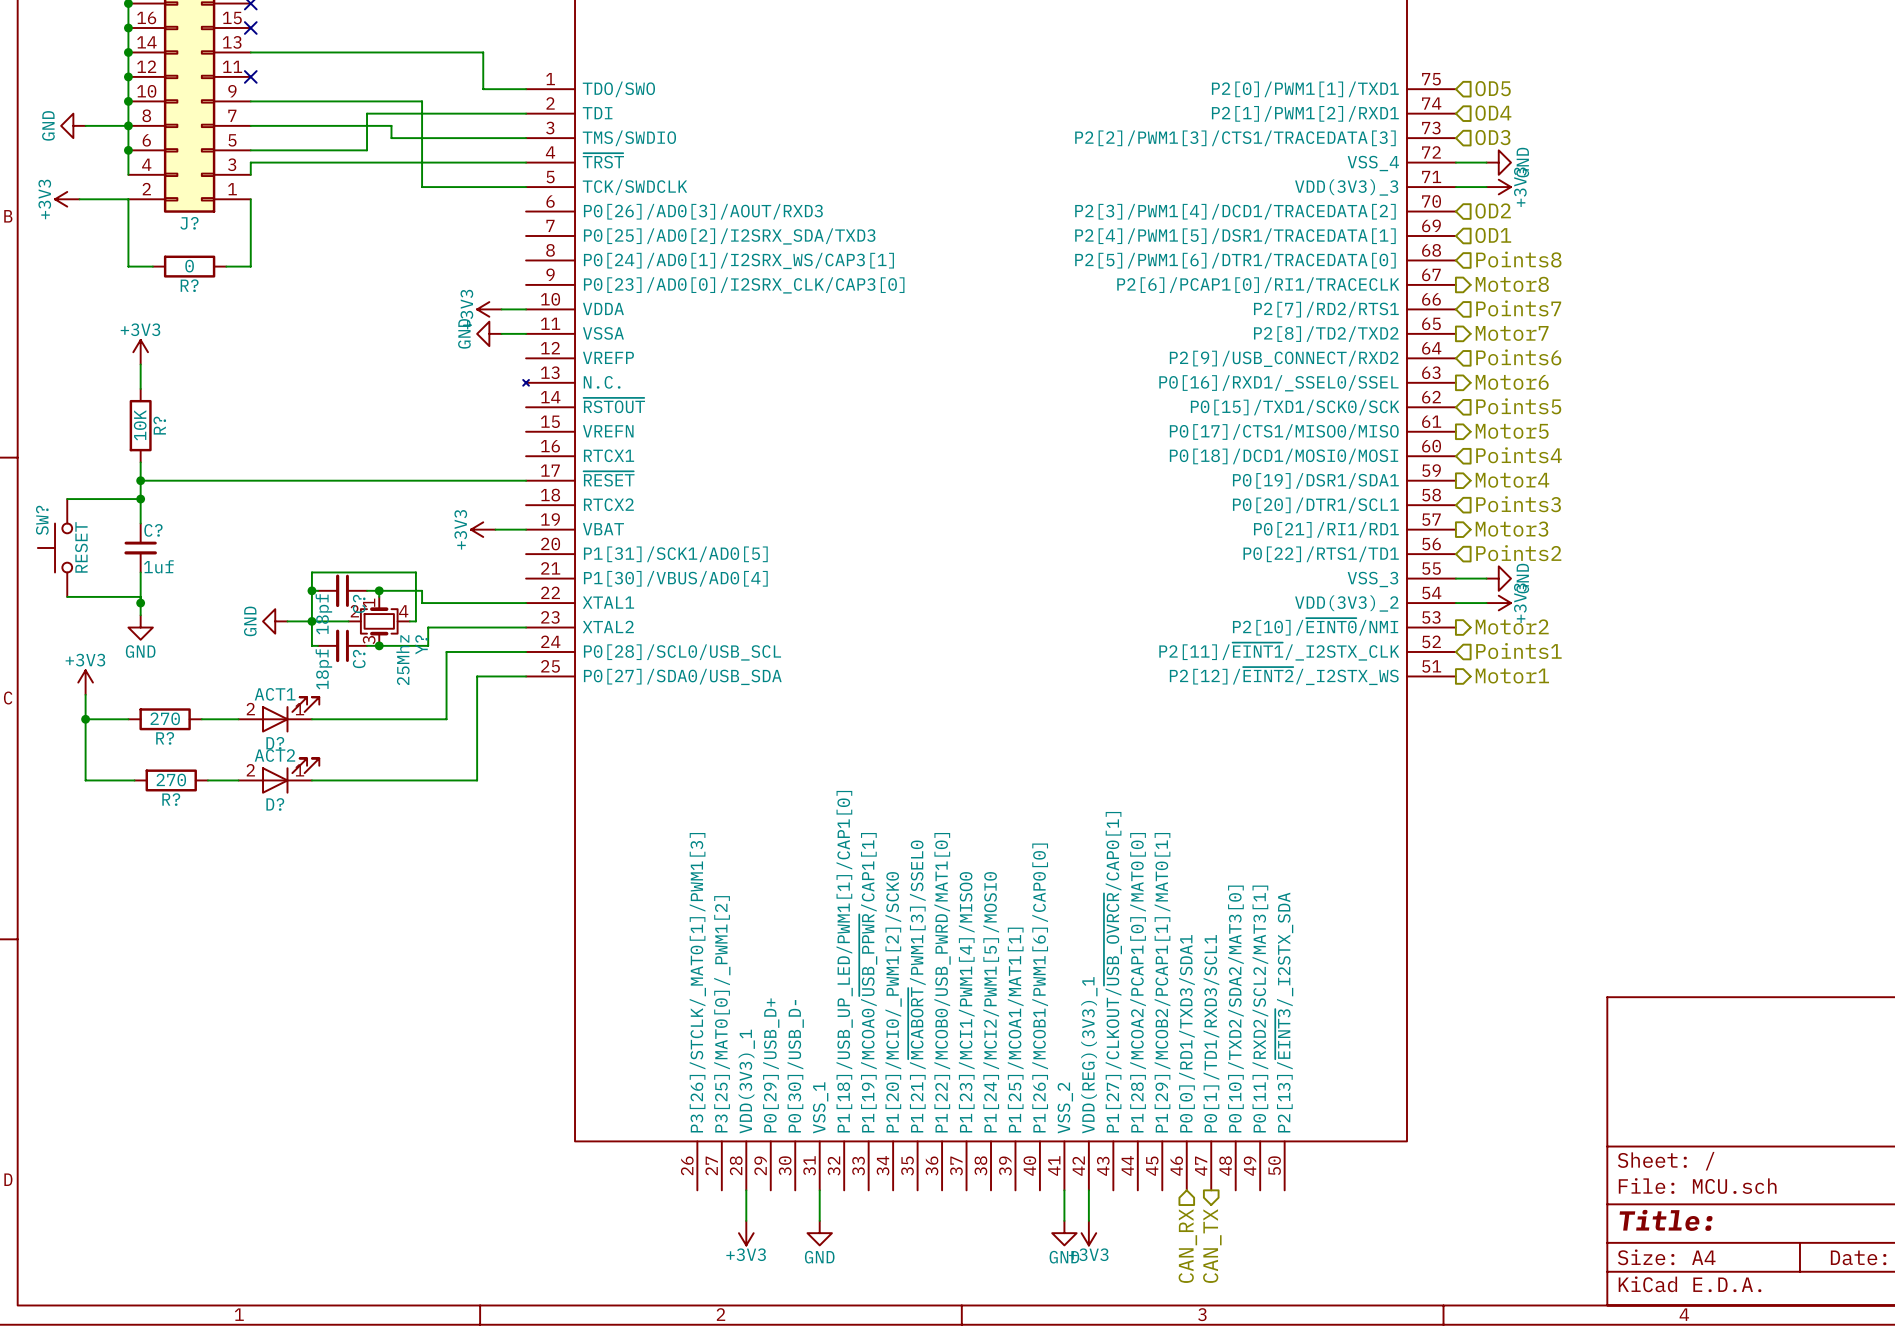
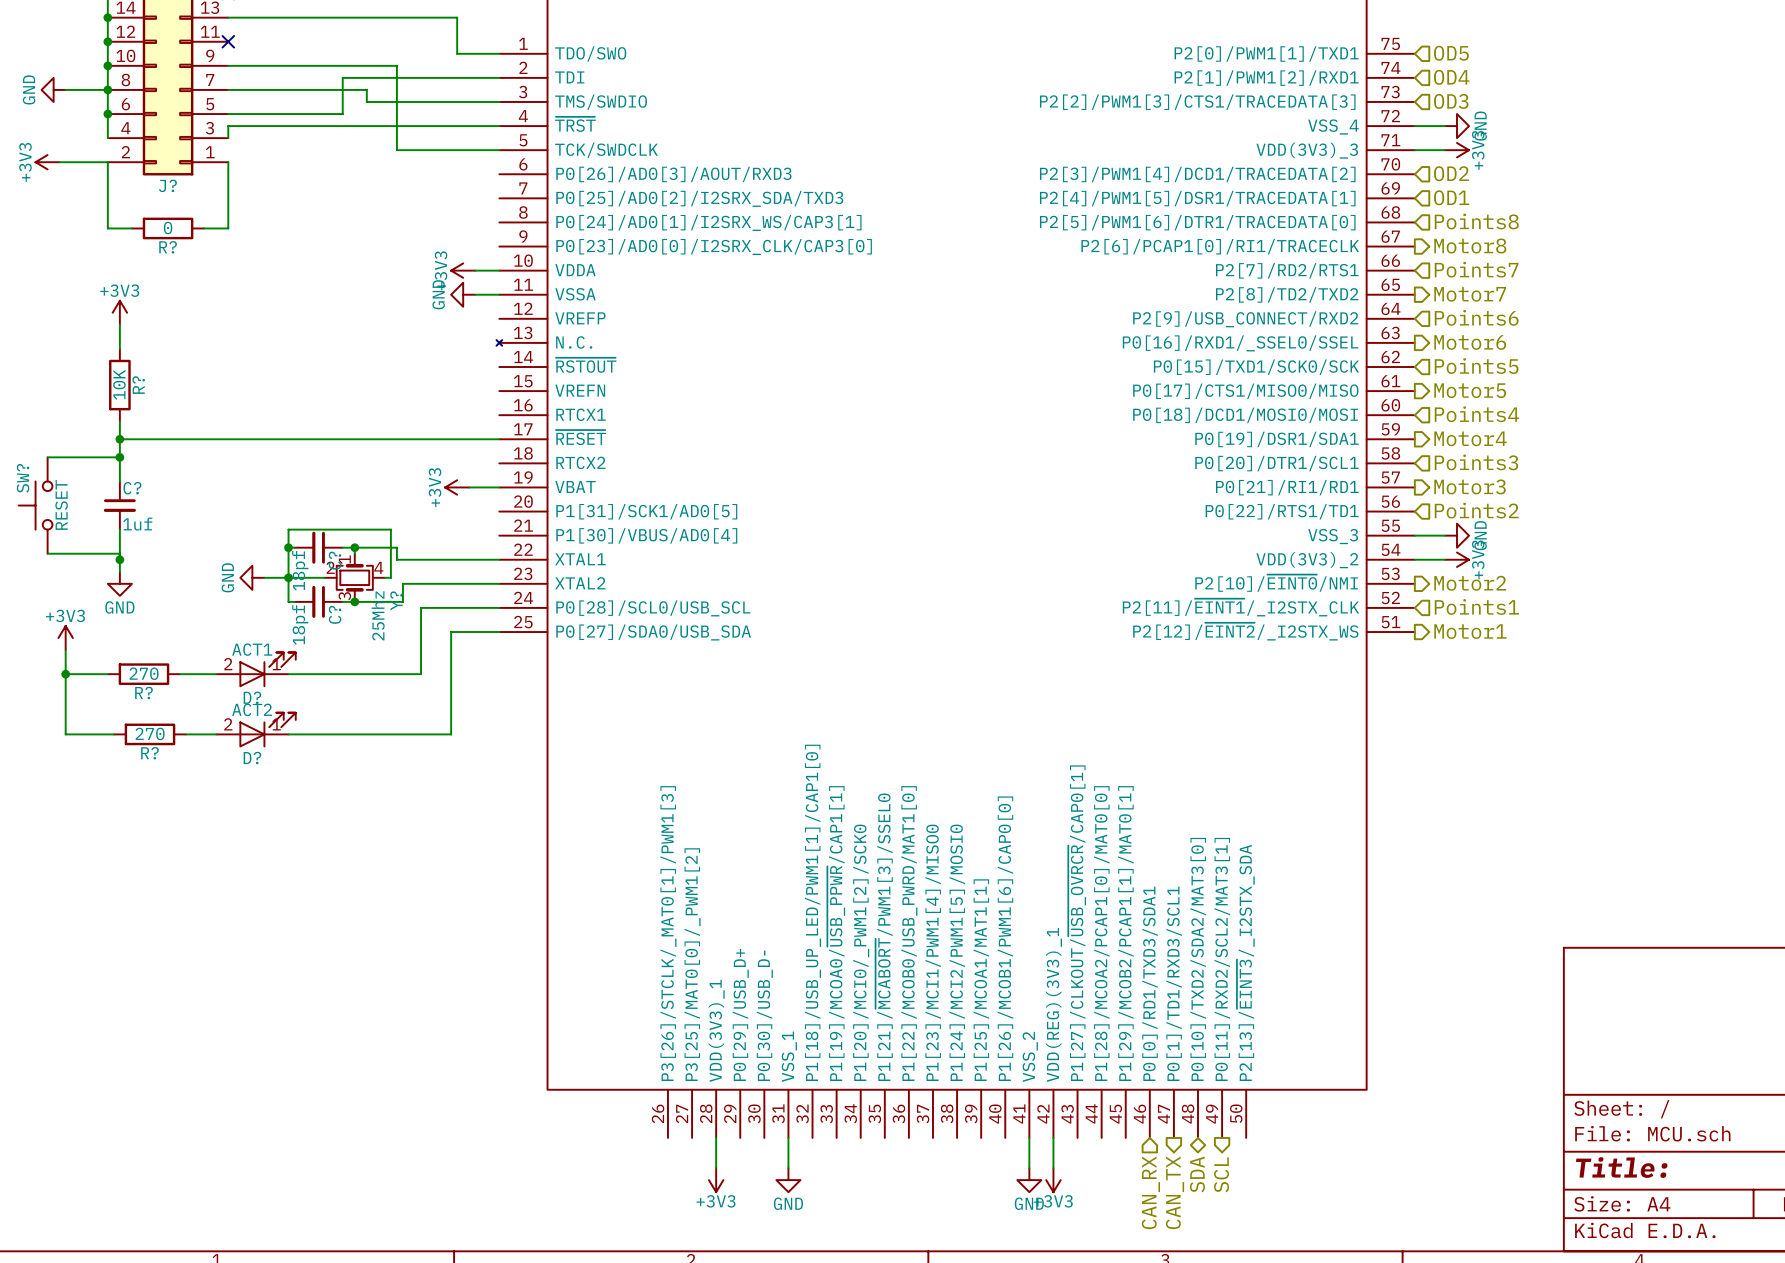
hierarchical label: none -> SDA (1197, 1174)
hierarchical label: none -> SCL (1221, 1174)

